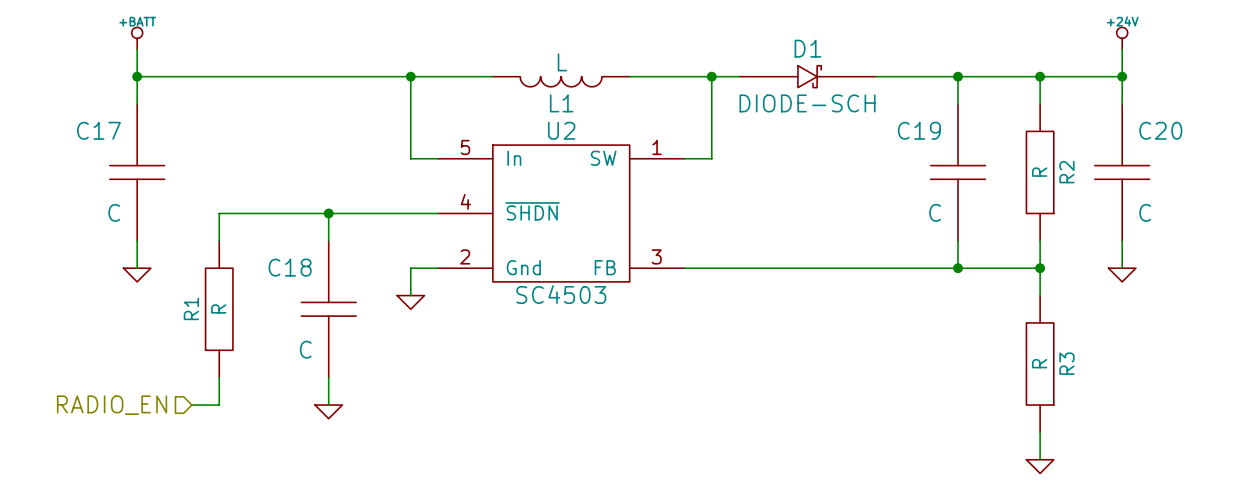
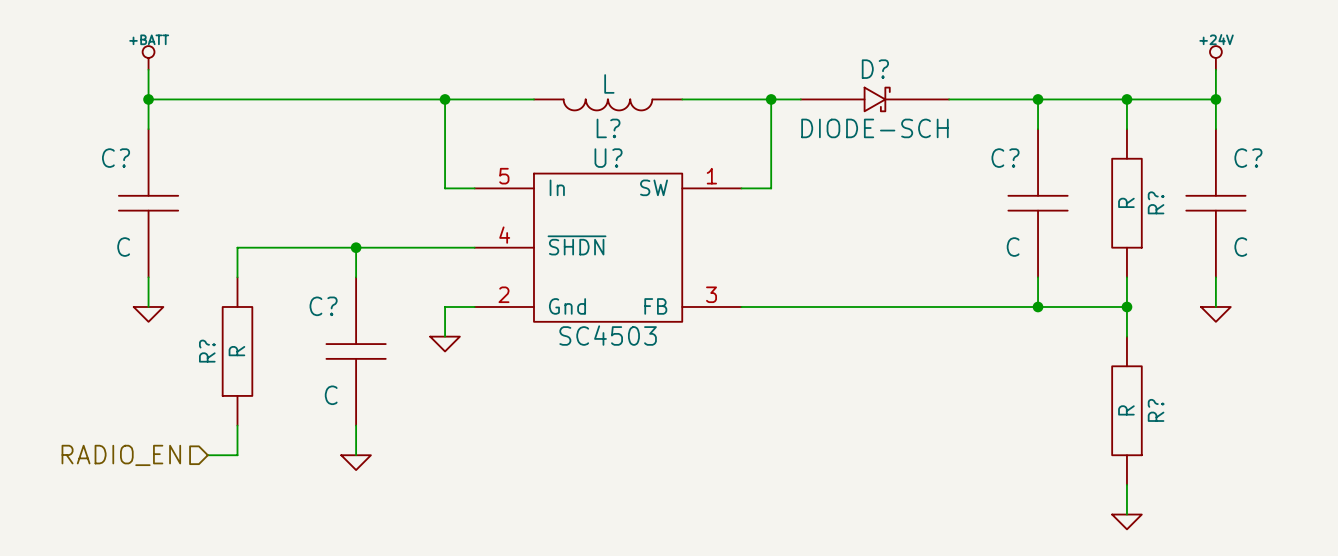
D1 name: D1 (807, 48) -> D? (875, 69)
L1 name: L1 (561, 103) -> L? (608, 128)
C17 name: C17 (98, 130) -> C? (116, 158)
U2 name: U2 (561, 130) -> U? (608, 158)
C19 name: C19 (919, 130) -> C? (1005, 158)
C20 name: C20 (1160, 130) -> C? (1248, 158)
R2 name: R2 (1066, 172) -> R? (1156, 202)
C18 name: C18 (290, 267) -> C? (323, 306)
R1 name: R1 (191, 308) -> R? (207, 351)
R3 name: R3 (1066, 363) -> R? (1156, 410)

